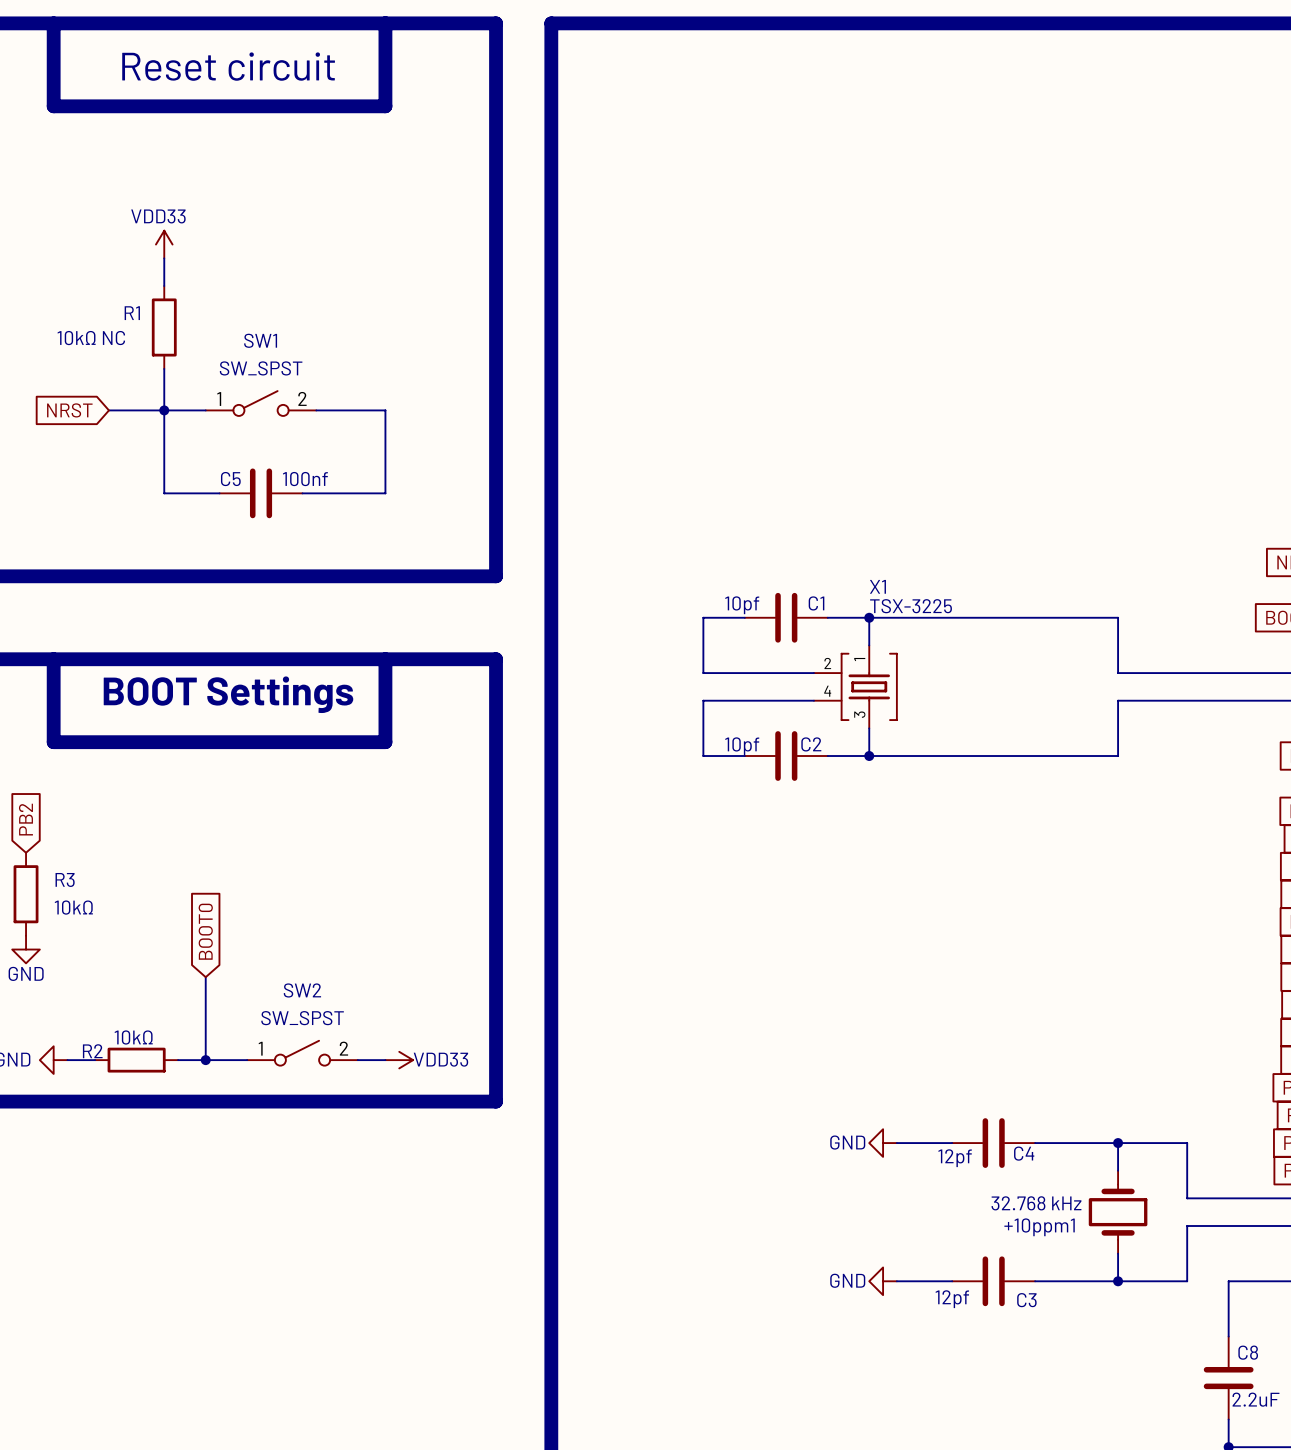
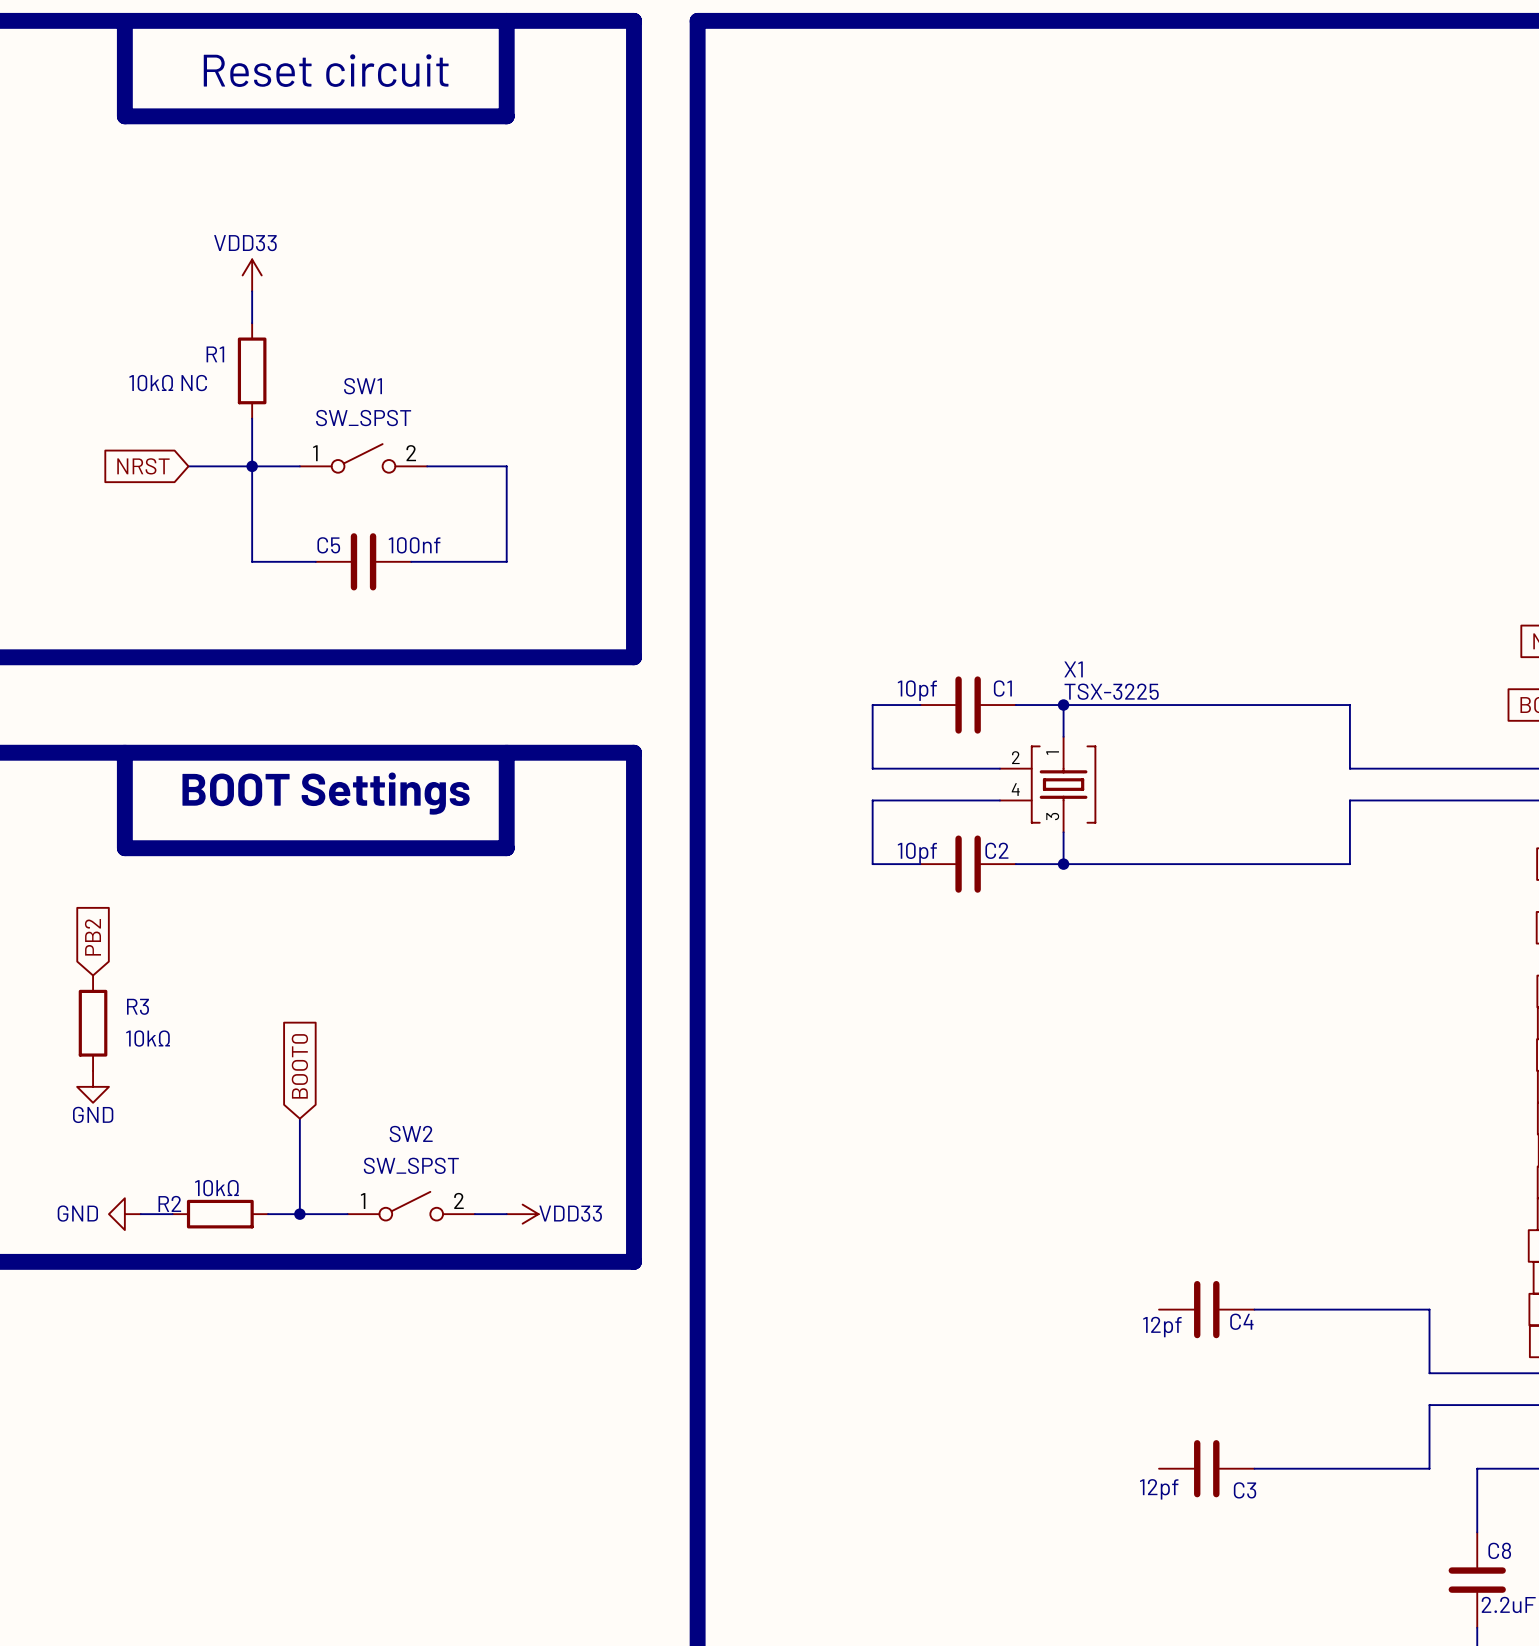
power symbol: GND (883, 1143) -> none
wire: (896, 1143) (952, 1143) -> none
wire: (1118, 1143) (1118, 1170) -> none
junction: (1118, 1143) -> none
+10ppm1: 32.768 kHz (1118, 1212) -> none
wire: (1118, 1253) (1118, 1281) -> none
power symbol: GND (883, 1281) -> none
wire: (896, 1281) (952, 1281) -> none
junction: (1118, 1281) -> none

